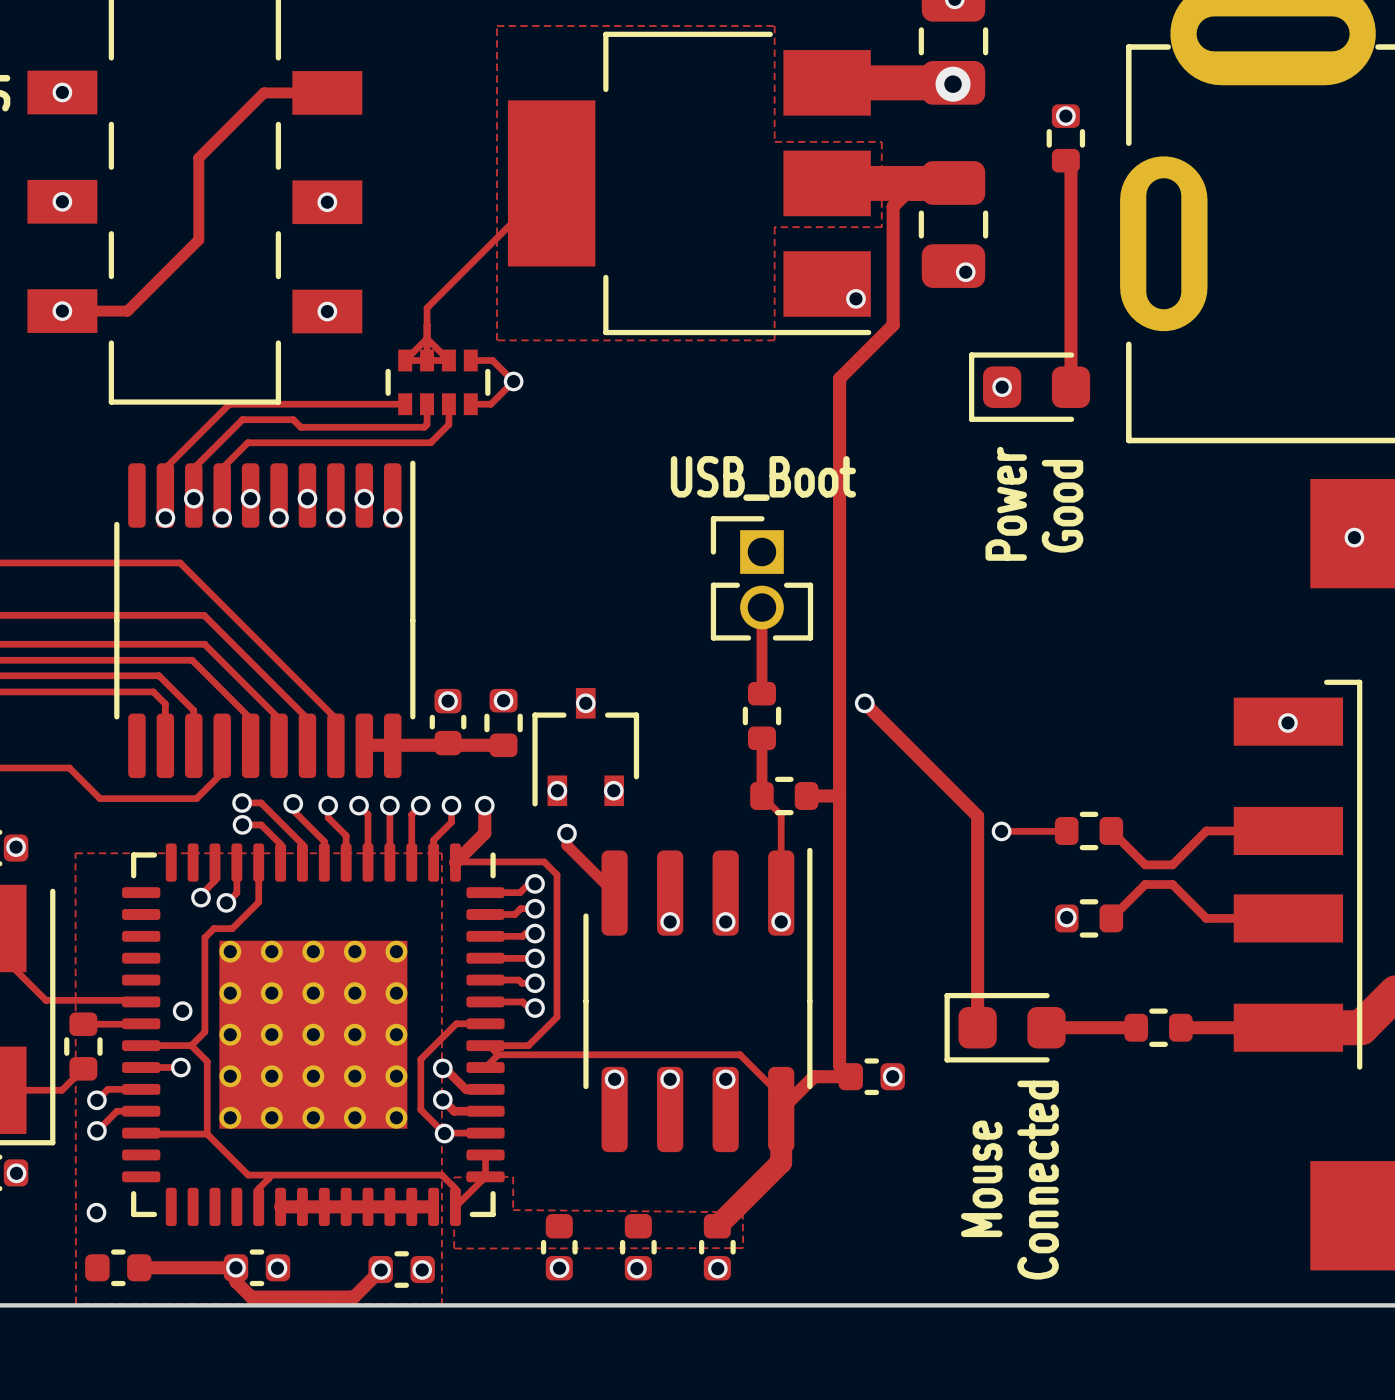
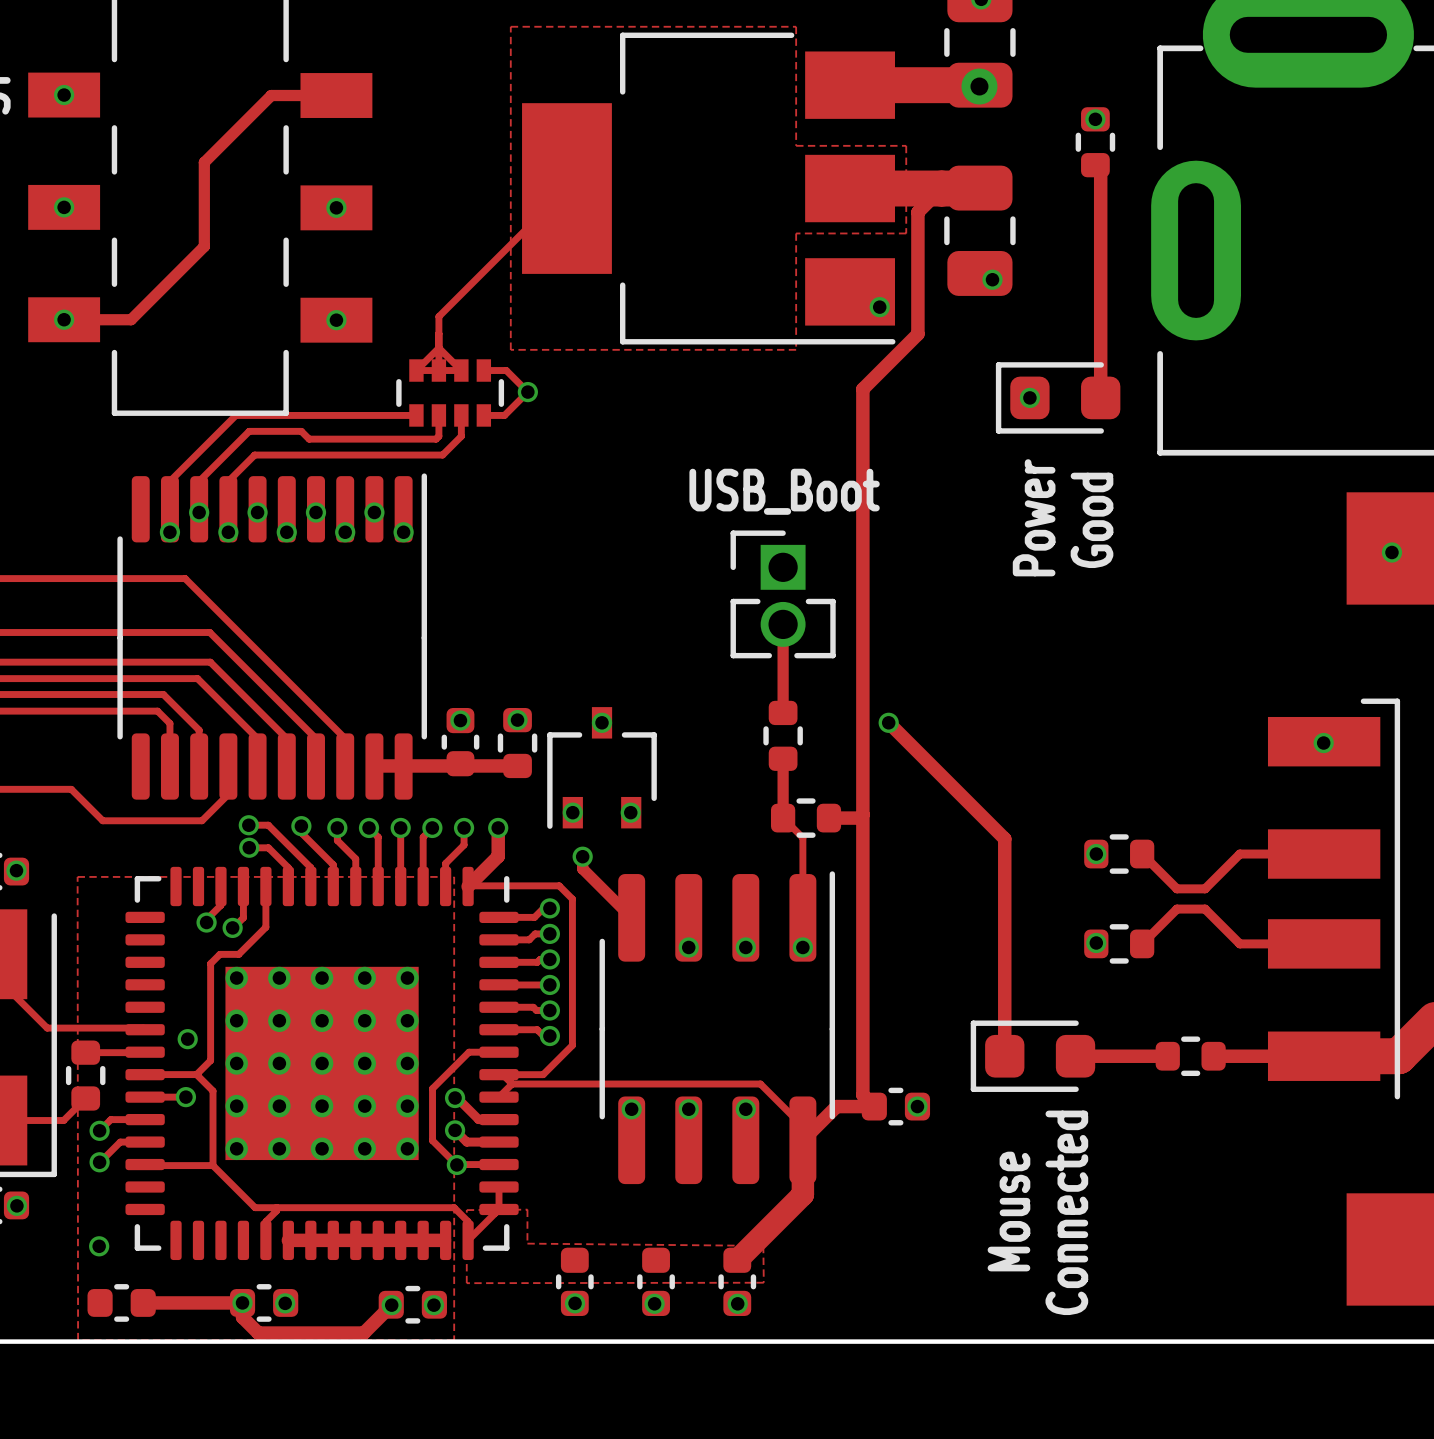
track: (1001, 831) (1066, 831) -> none
via position: (1001, 831) -> (1096, 854)

